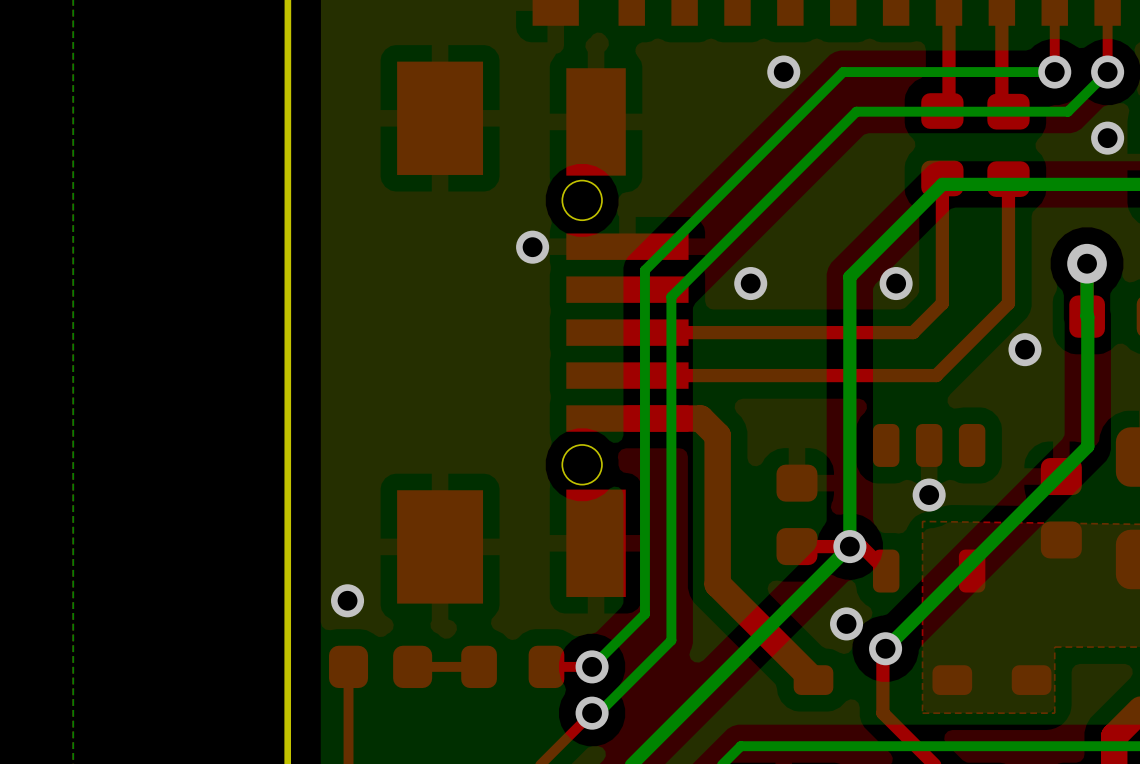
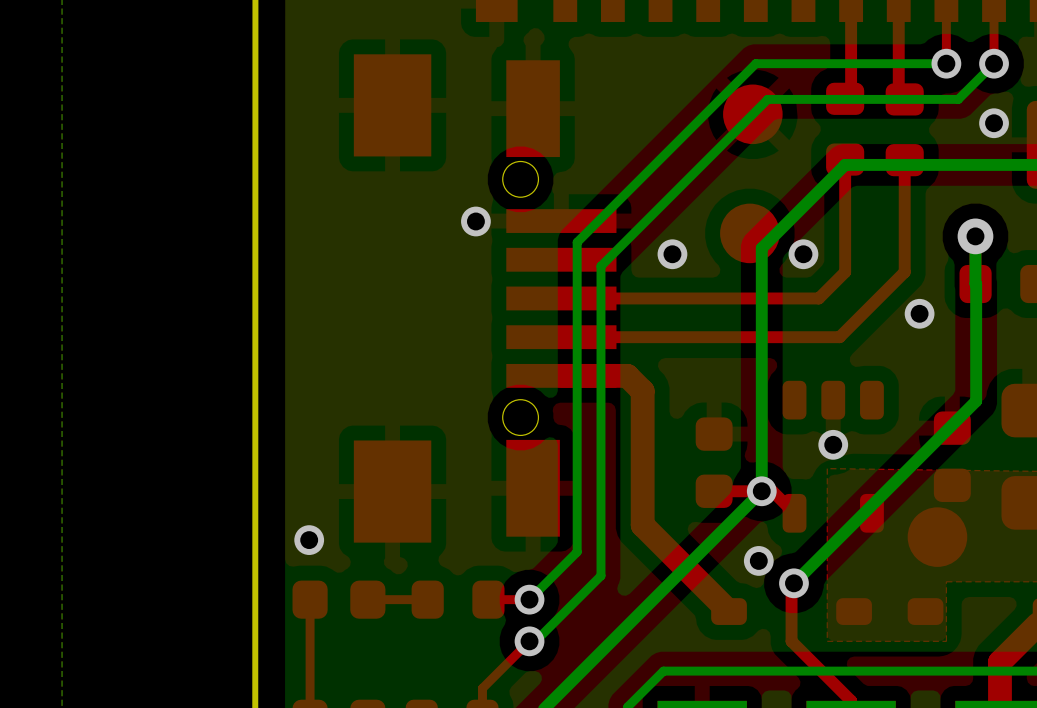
via: (783, 72) -> none
part: none -> (752, 114)
part: none -> (749, 233)
part: none -> (937, 537)

